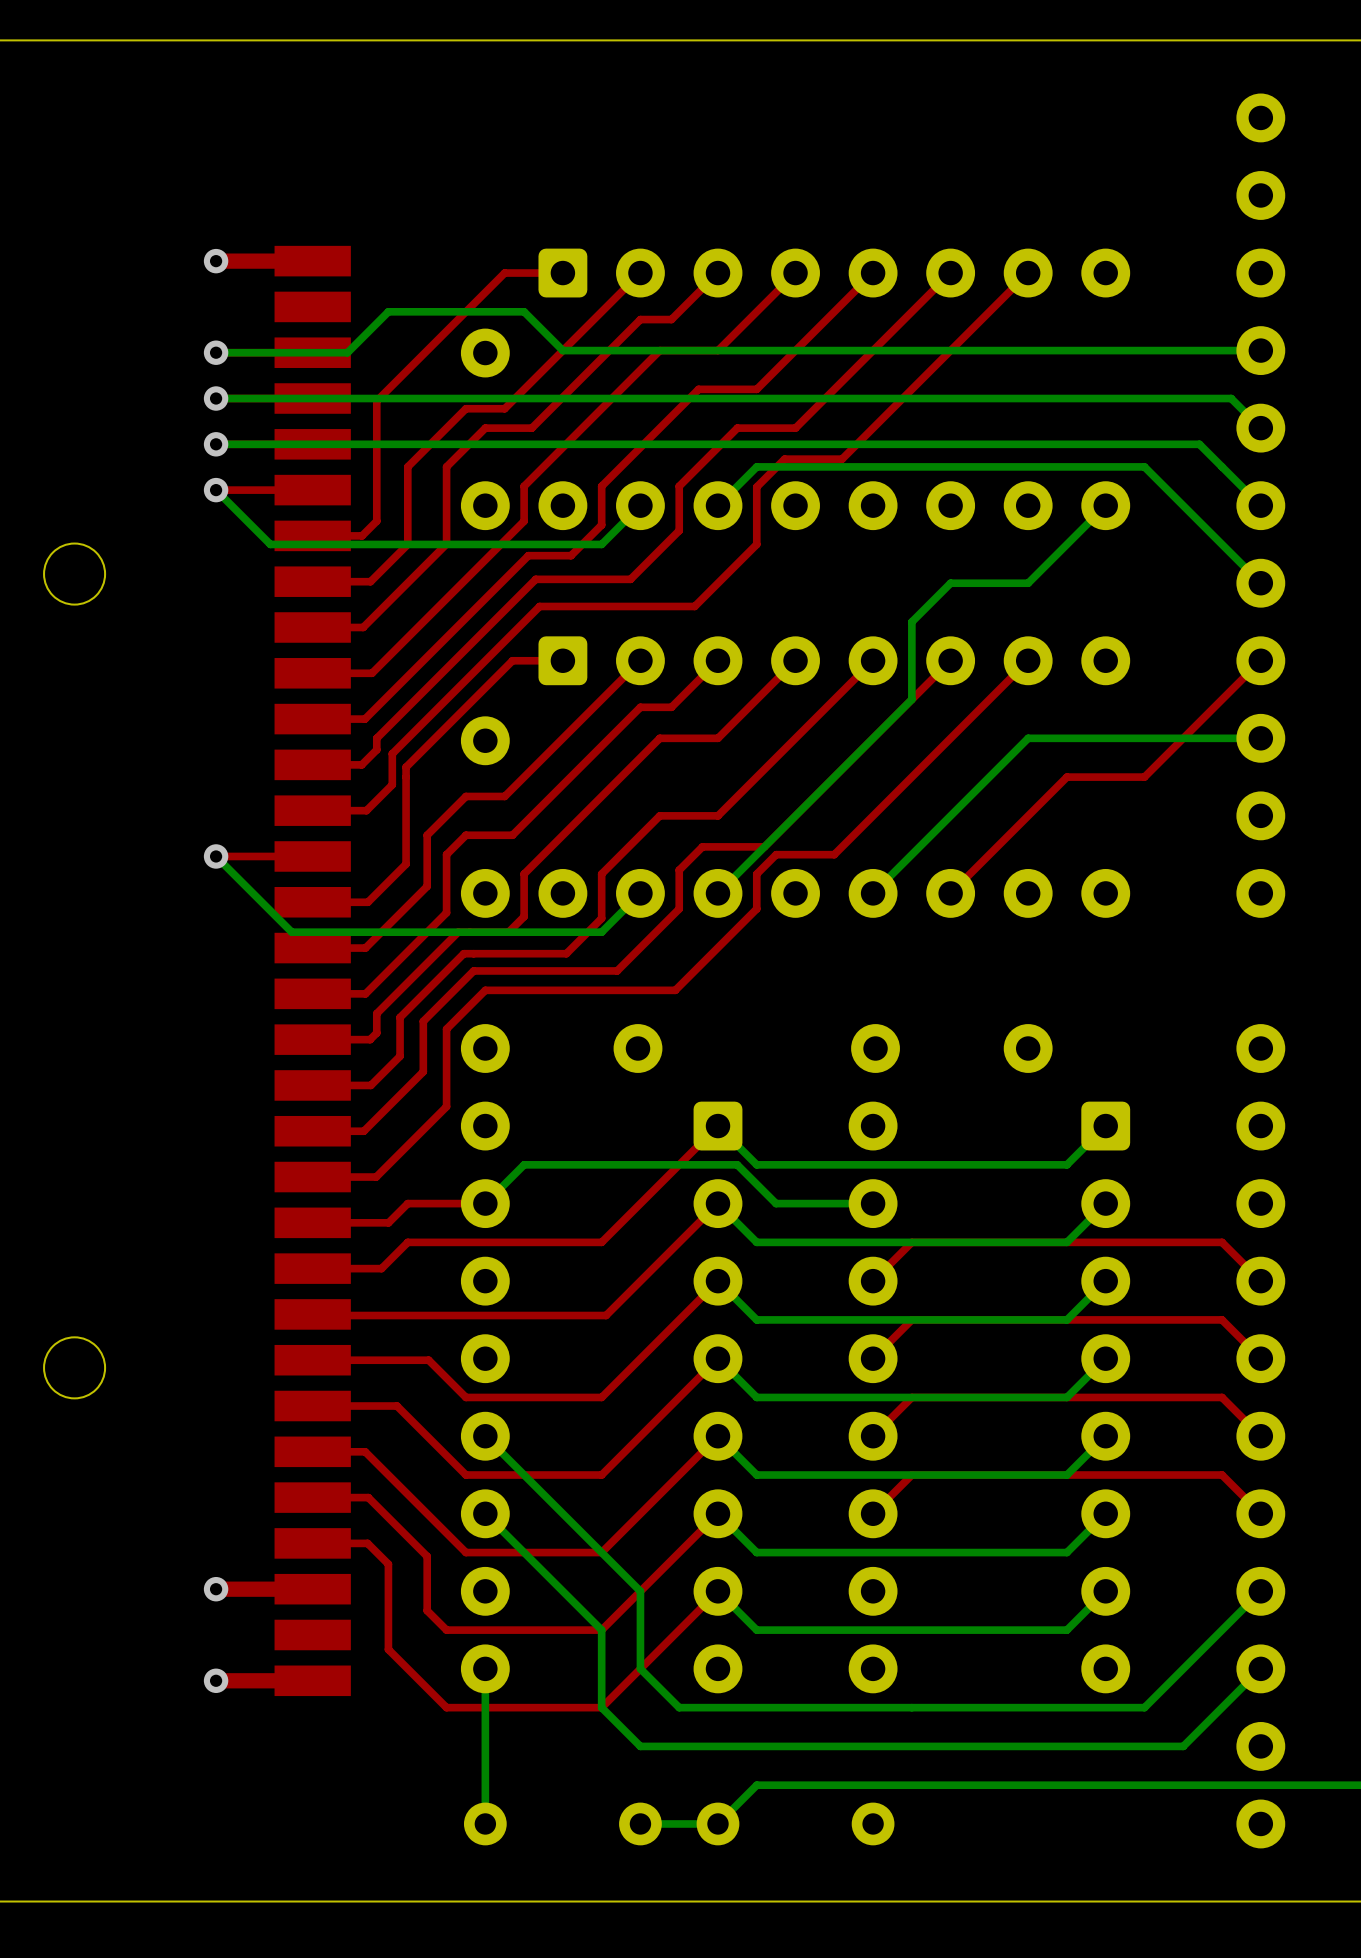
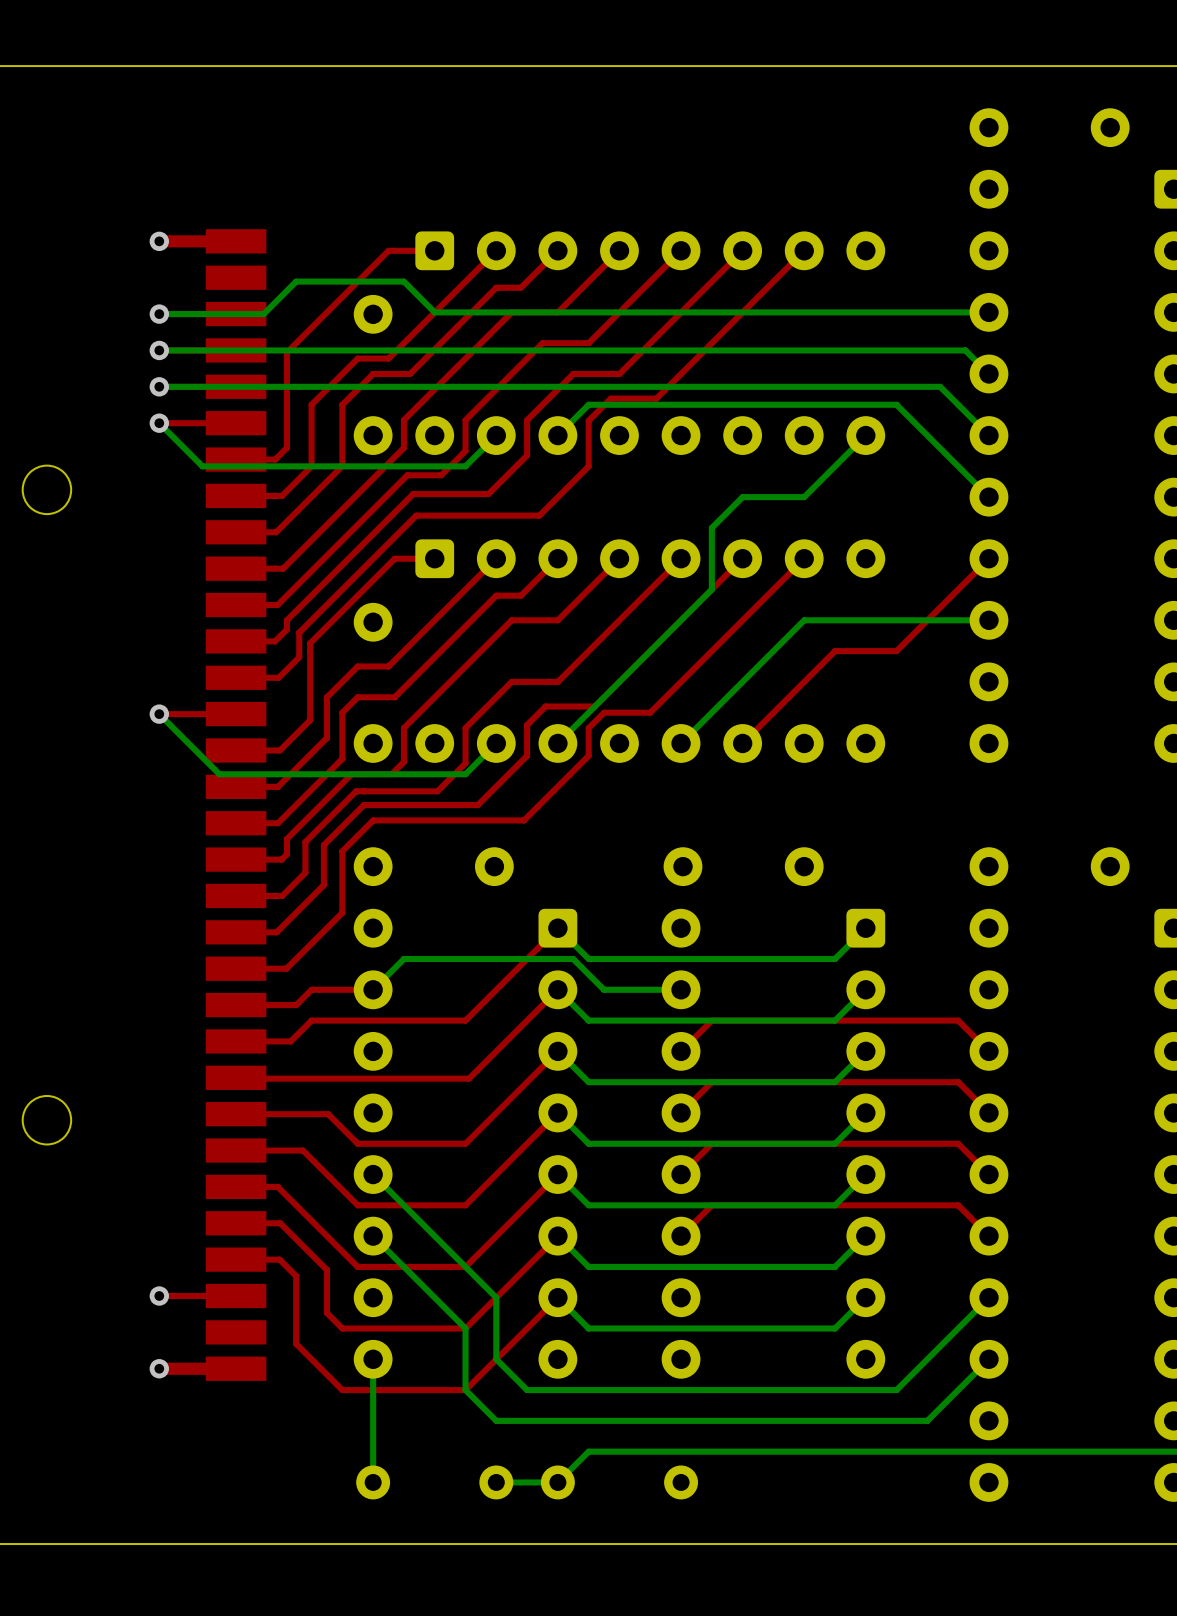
top track width: thick (312, 1589) (216, 1589) -> thin (236, 1296) (159, 1296)

